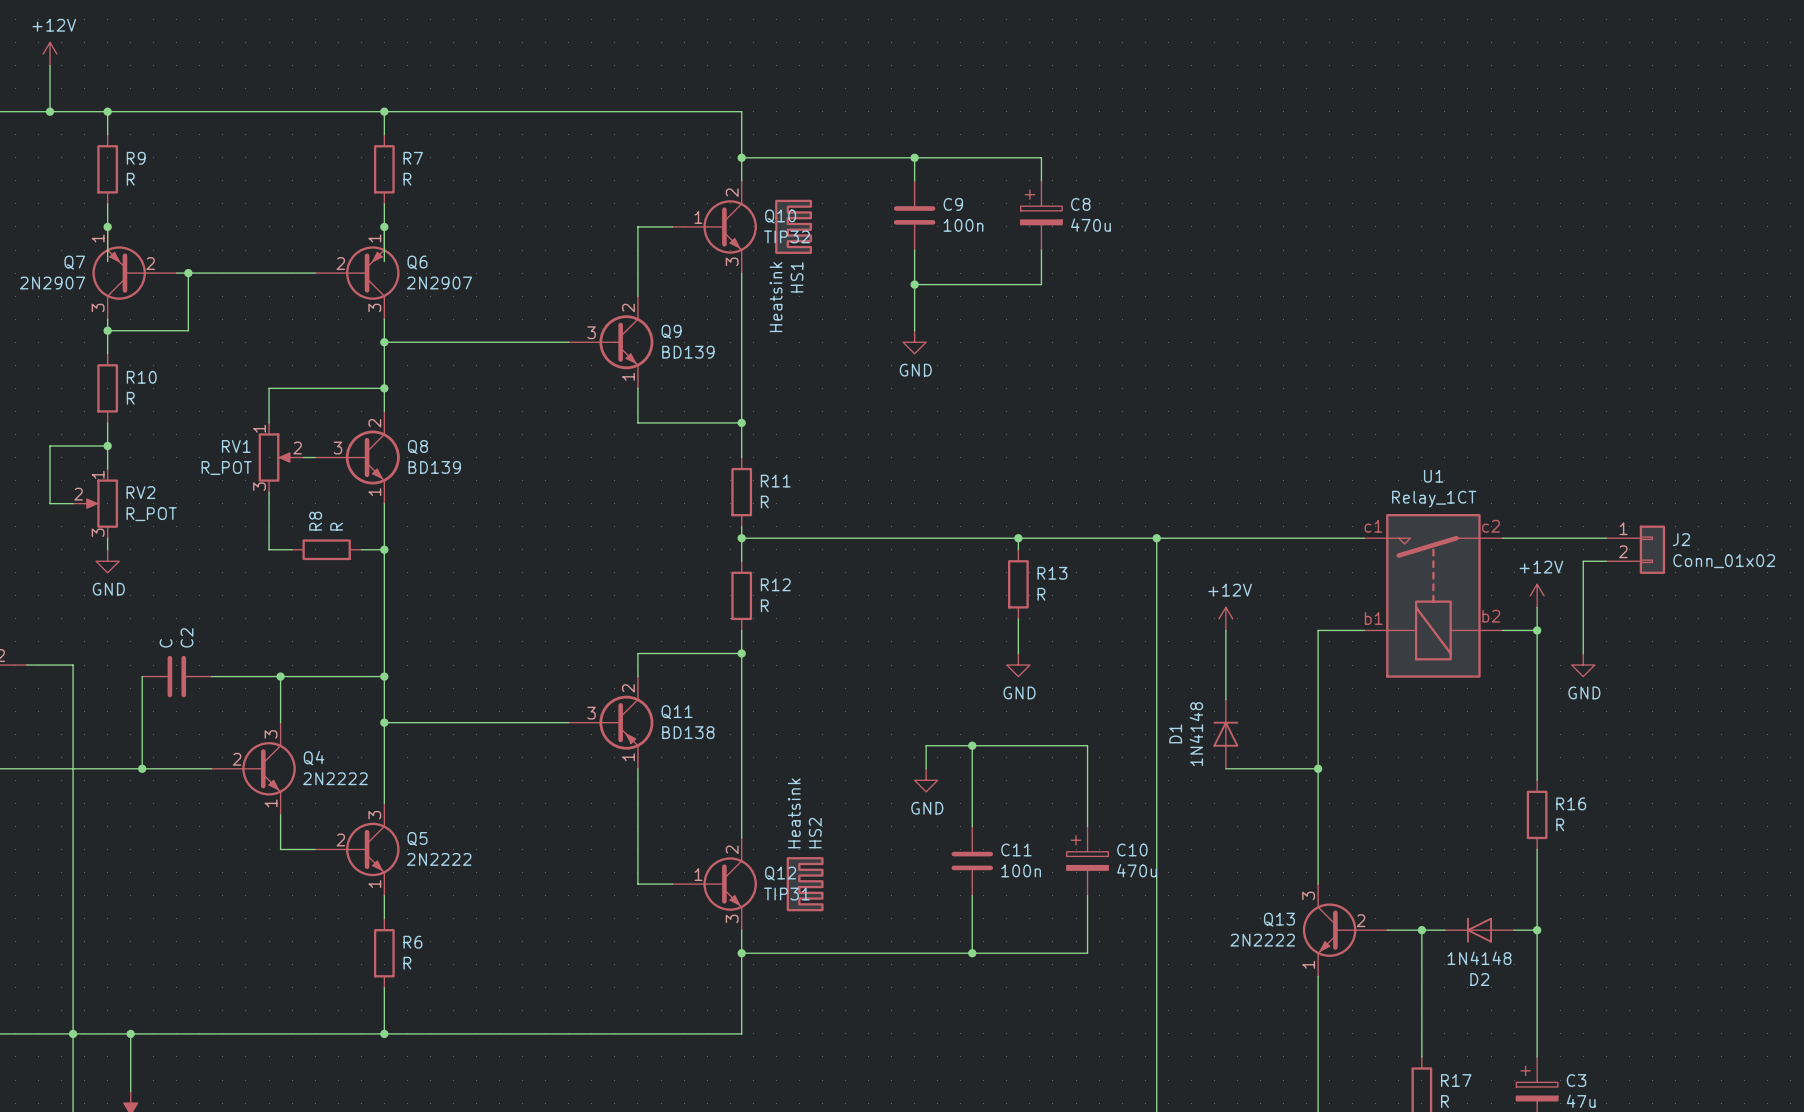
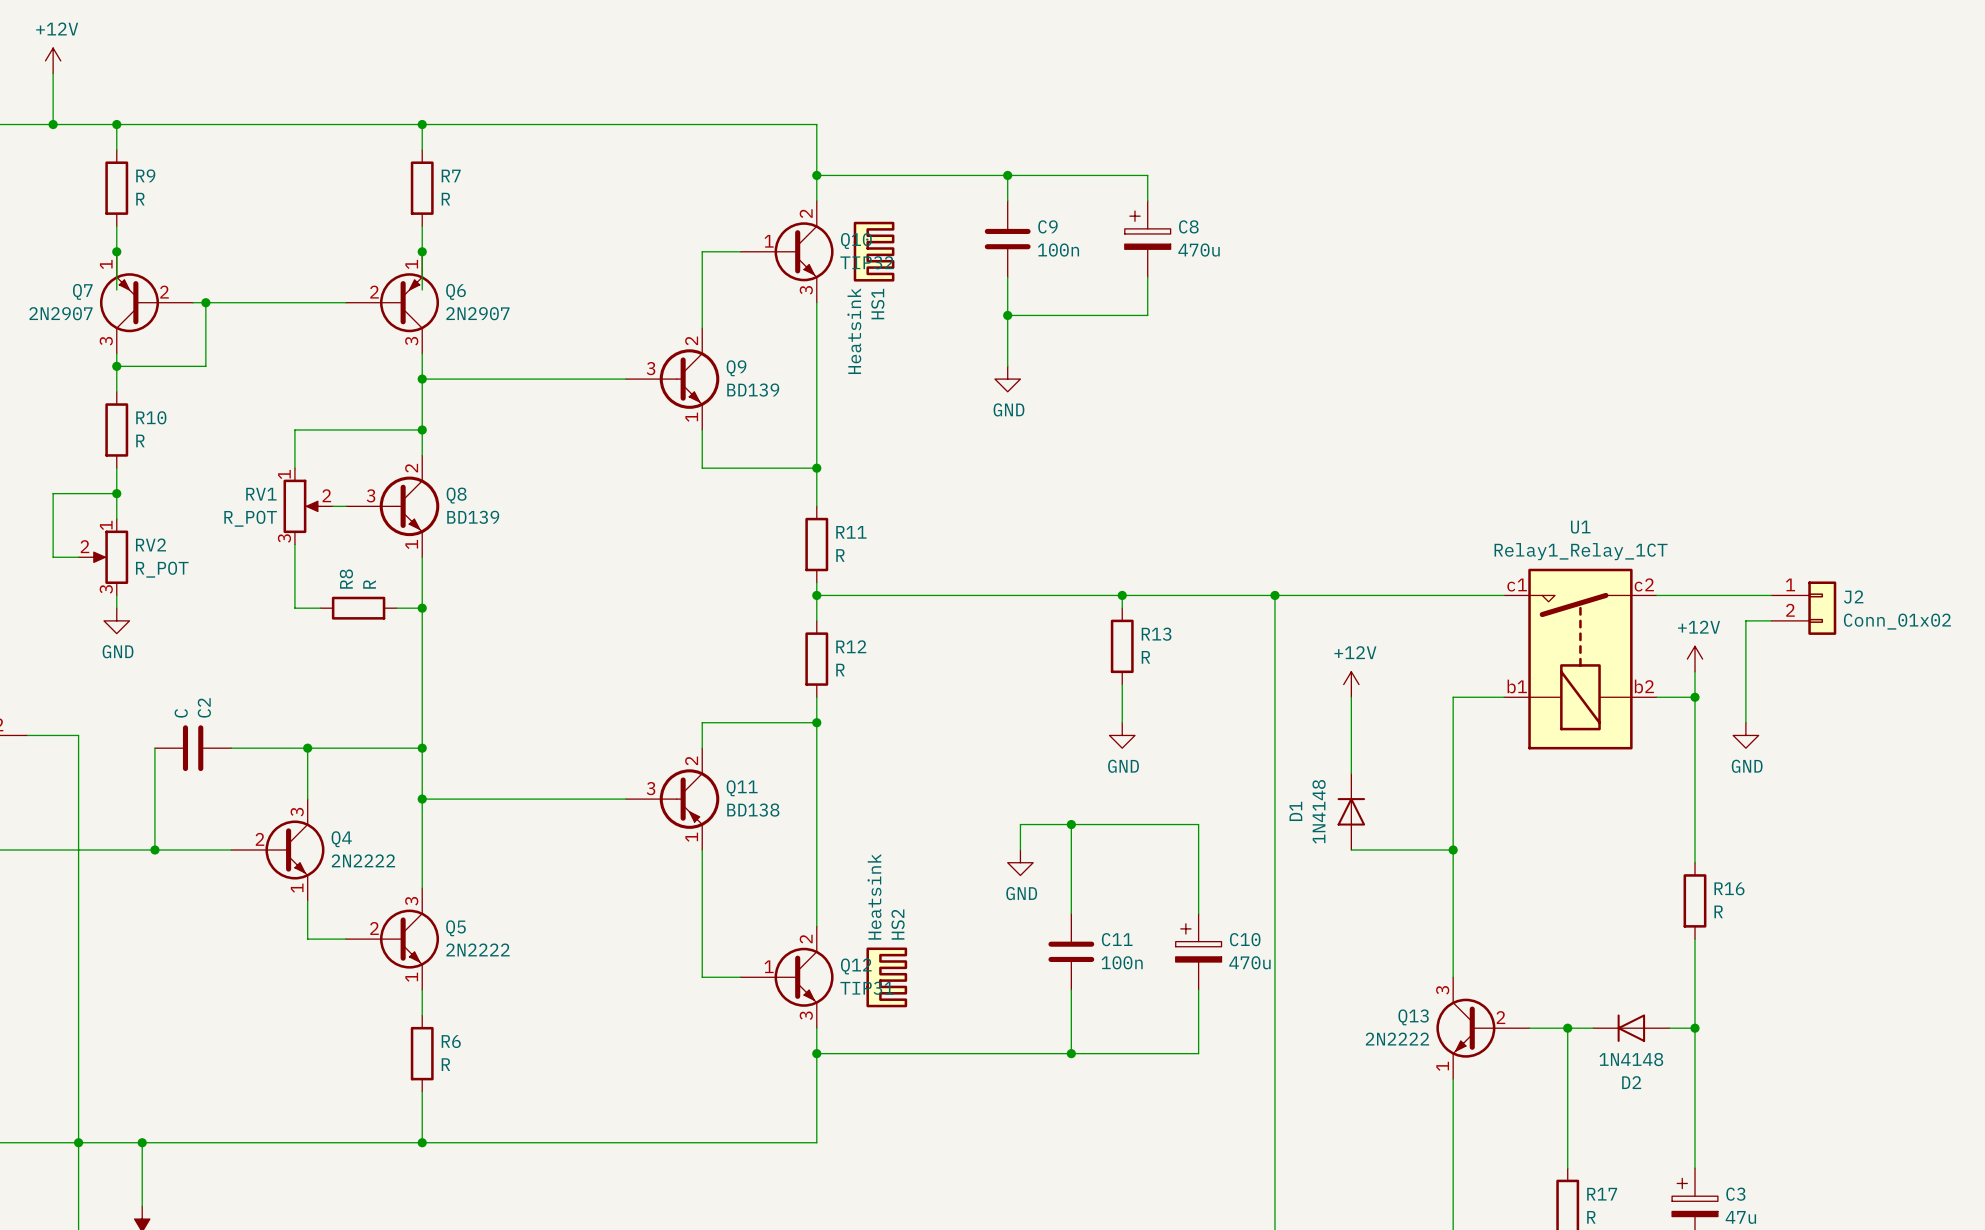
U1 value: Relay_1CT (1434, 499) -> Relay1_Relay_1CT (1581, 551)
U1 text: c1 (1373, 526) -> none
U1 text: c2 (1491, 526) -> none
U1 pin number: none -> c1 (1517, 585)
U1 pin number: none -> c2 (1644, 584)
U1 text: b2 (1491, 616) -> none
U1 text: b1 (1373, 618) -> none
U1 pin number: none -> b1 (1517, 686)
U1 pin number: none -> b2 (1644, 686)

